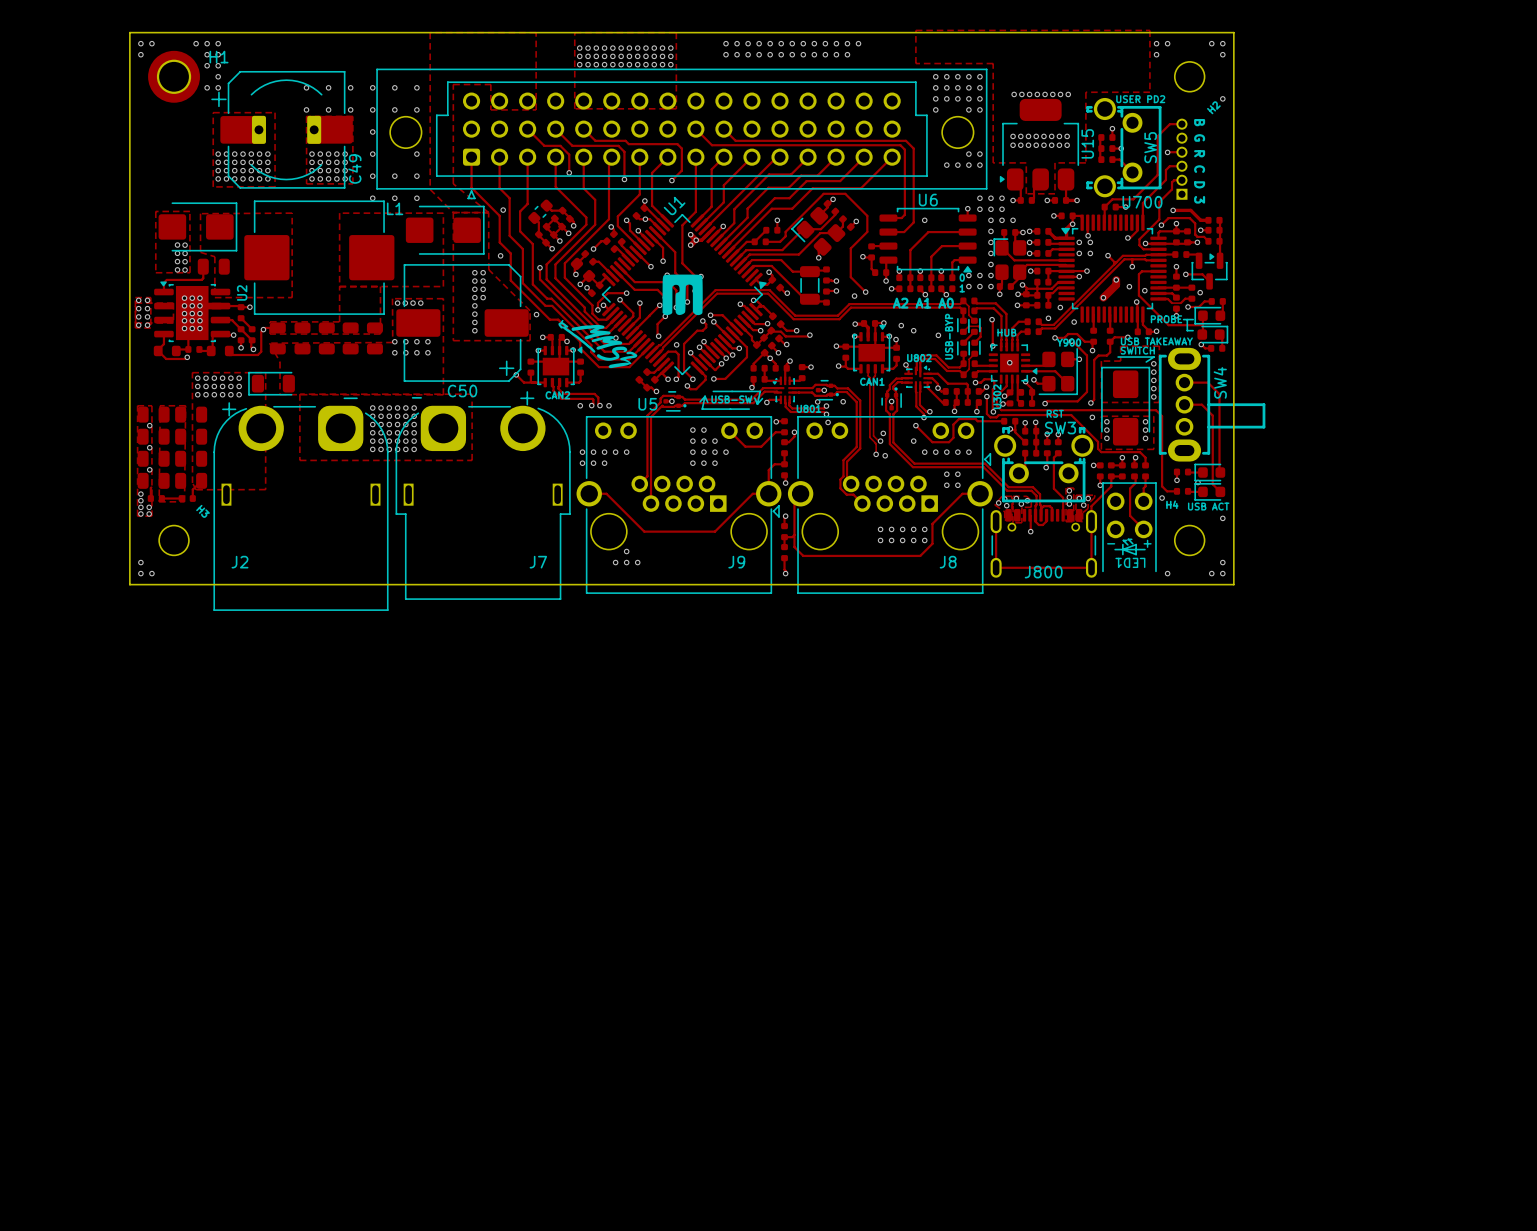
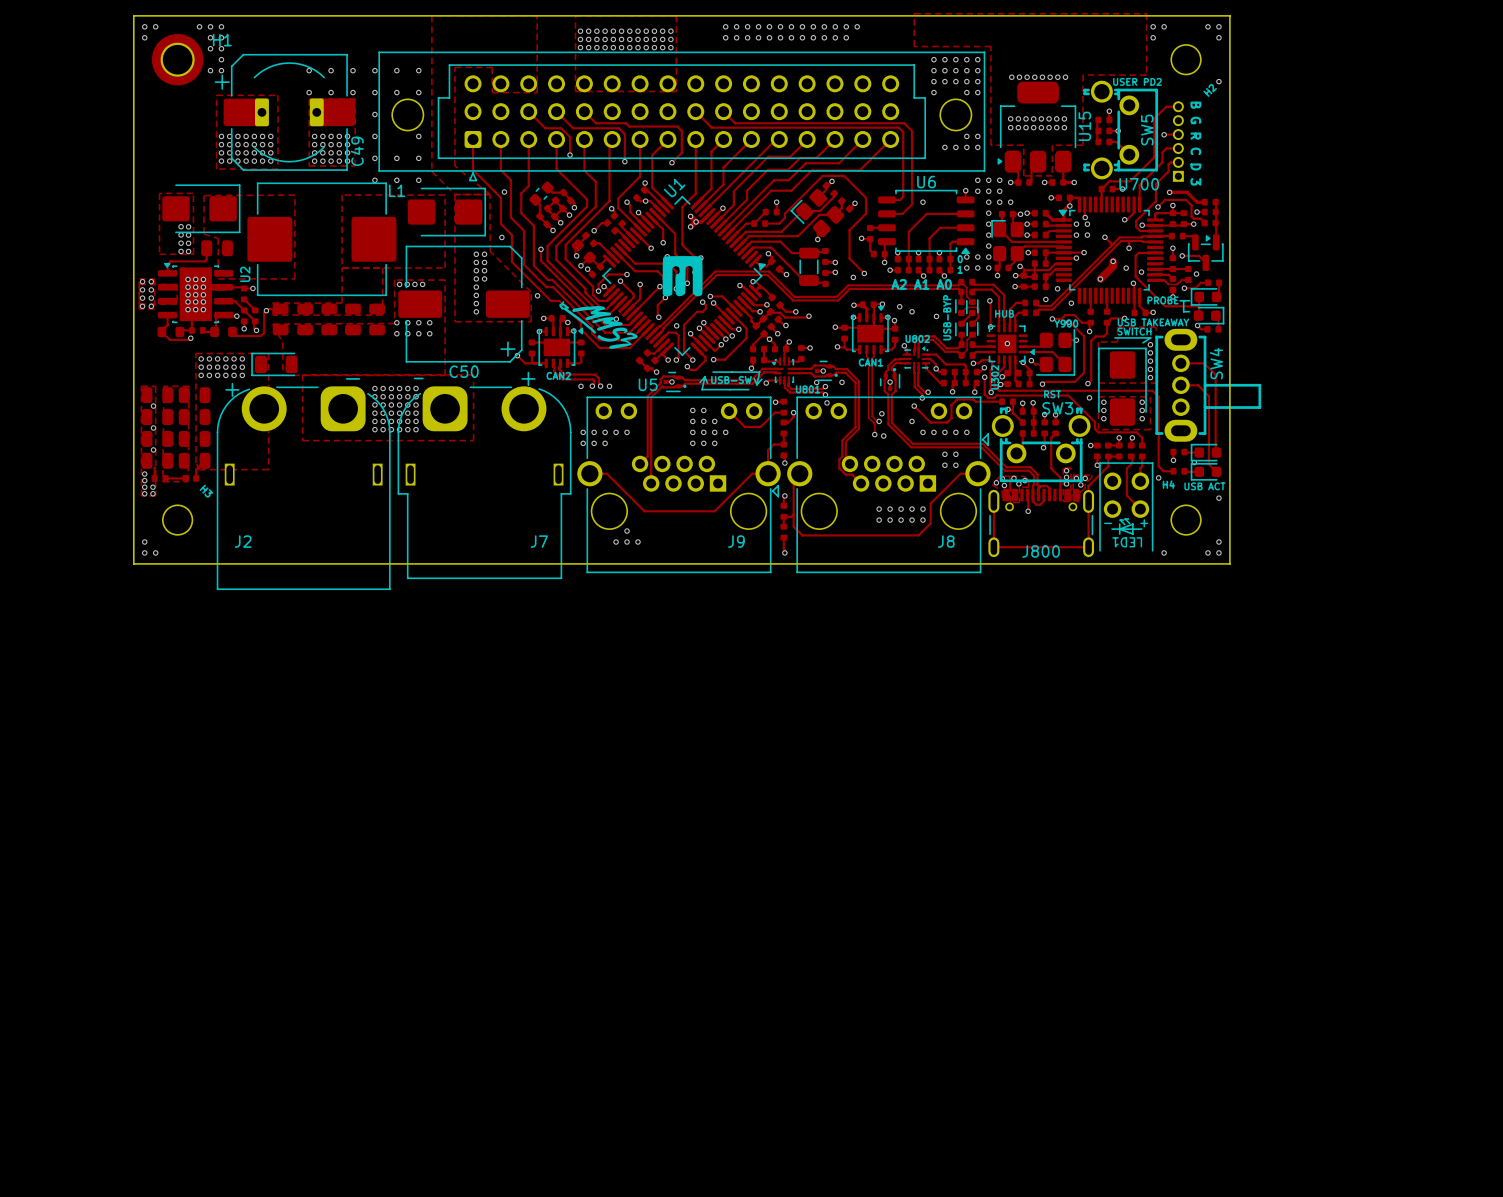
track: none -> (950, 259) (950, 270)

